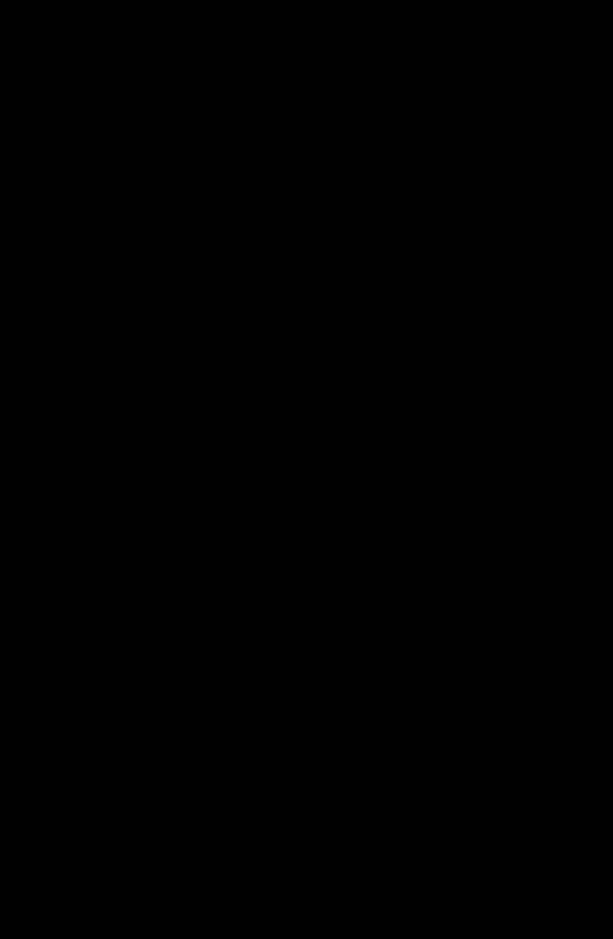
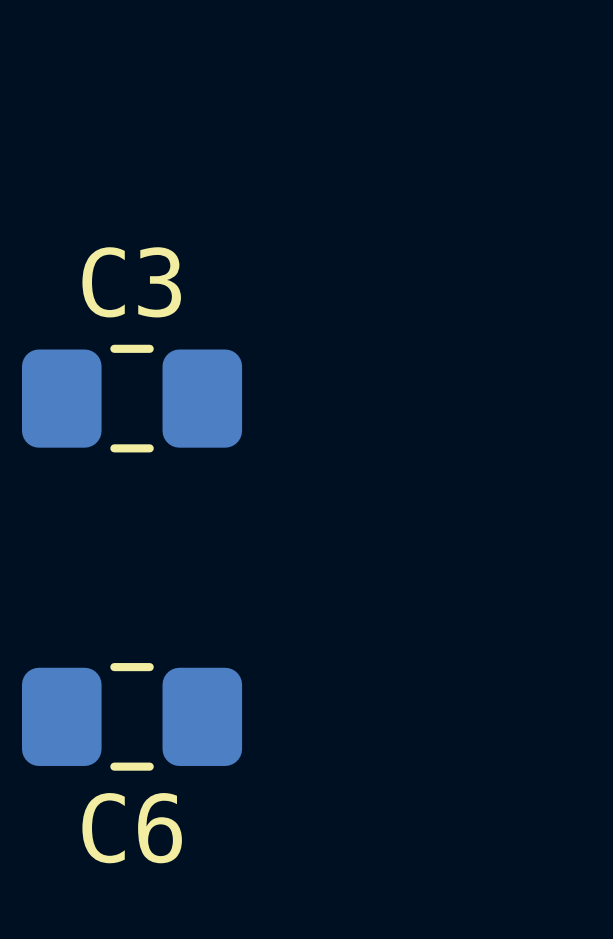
C3: none -> (132, 398)
C6: none -> (132, 716)

